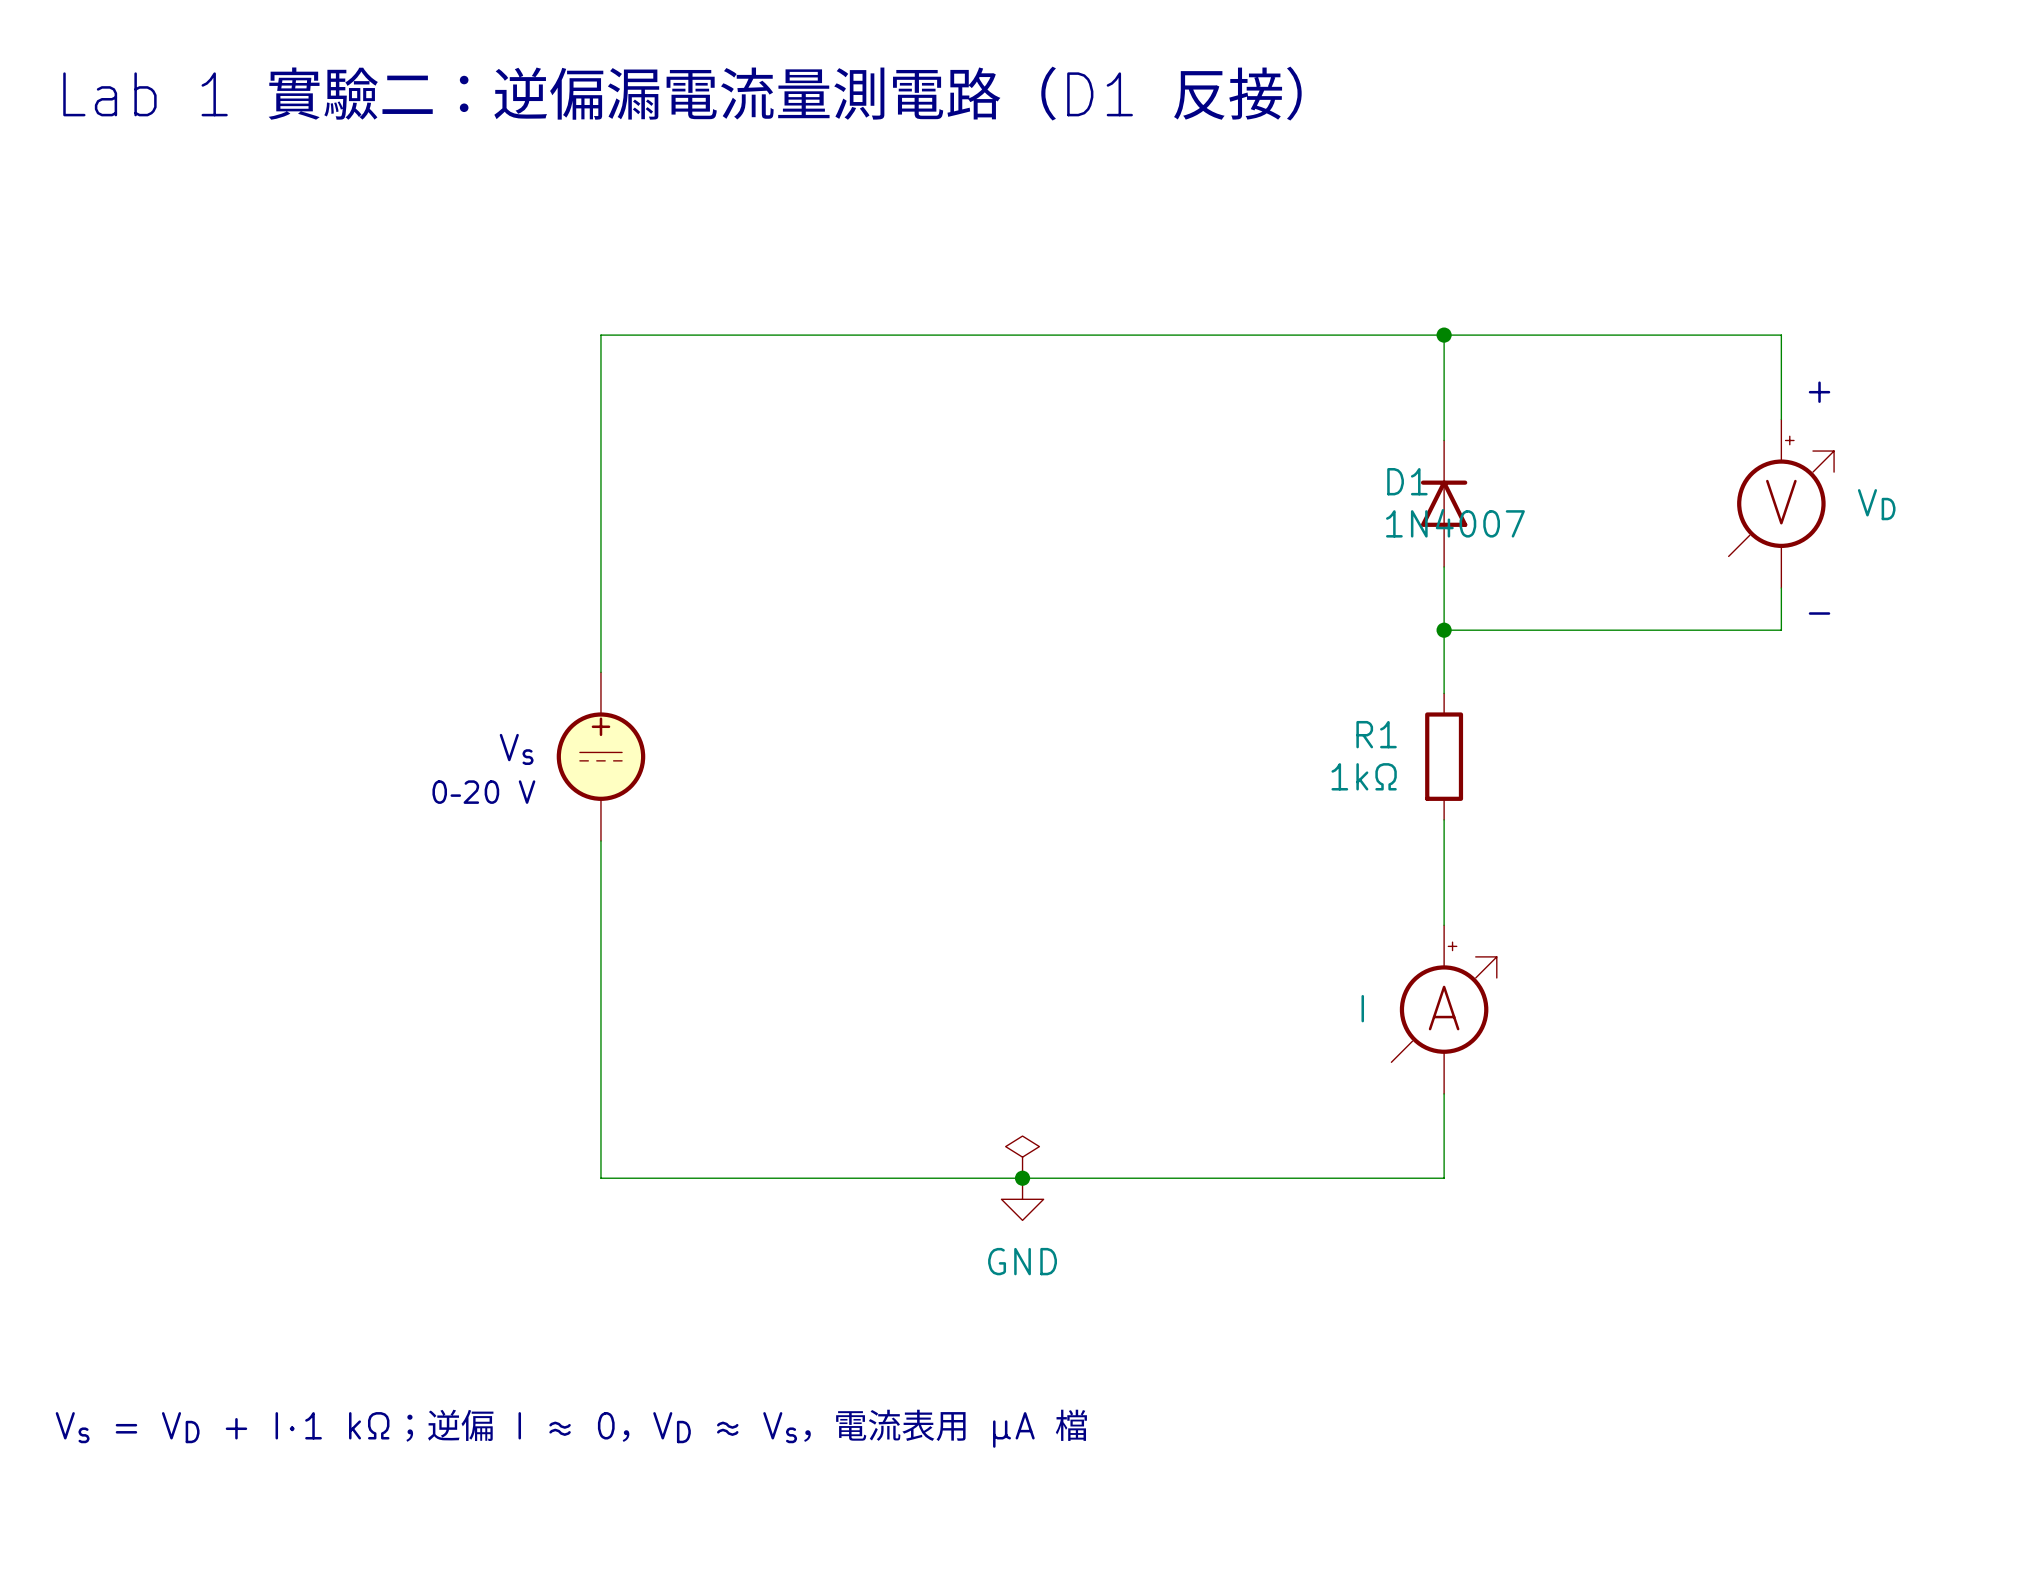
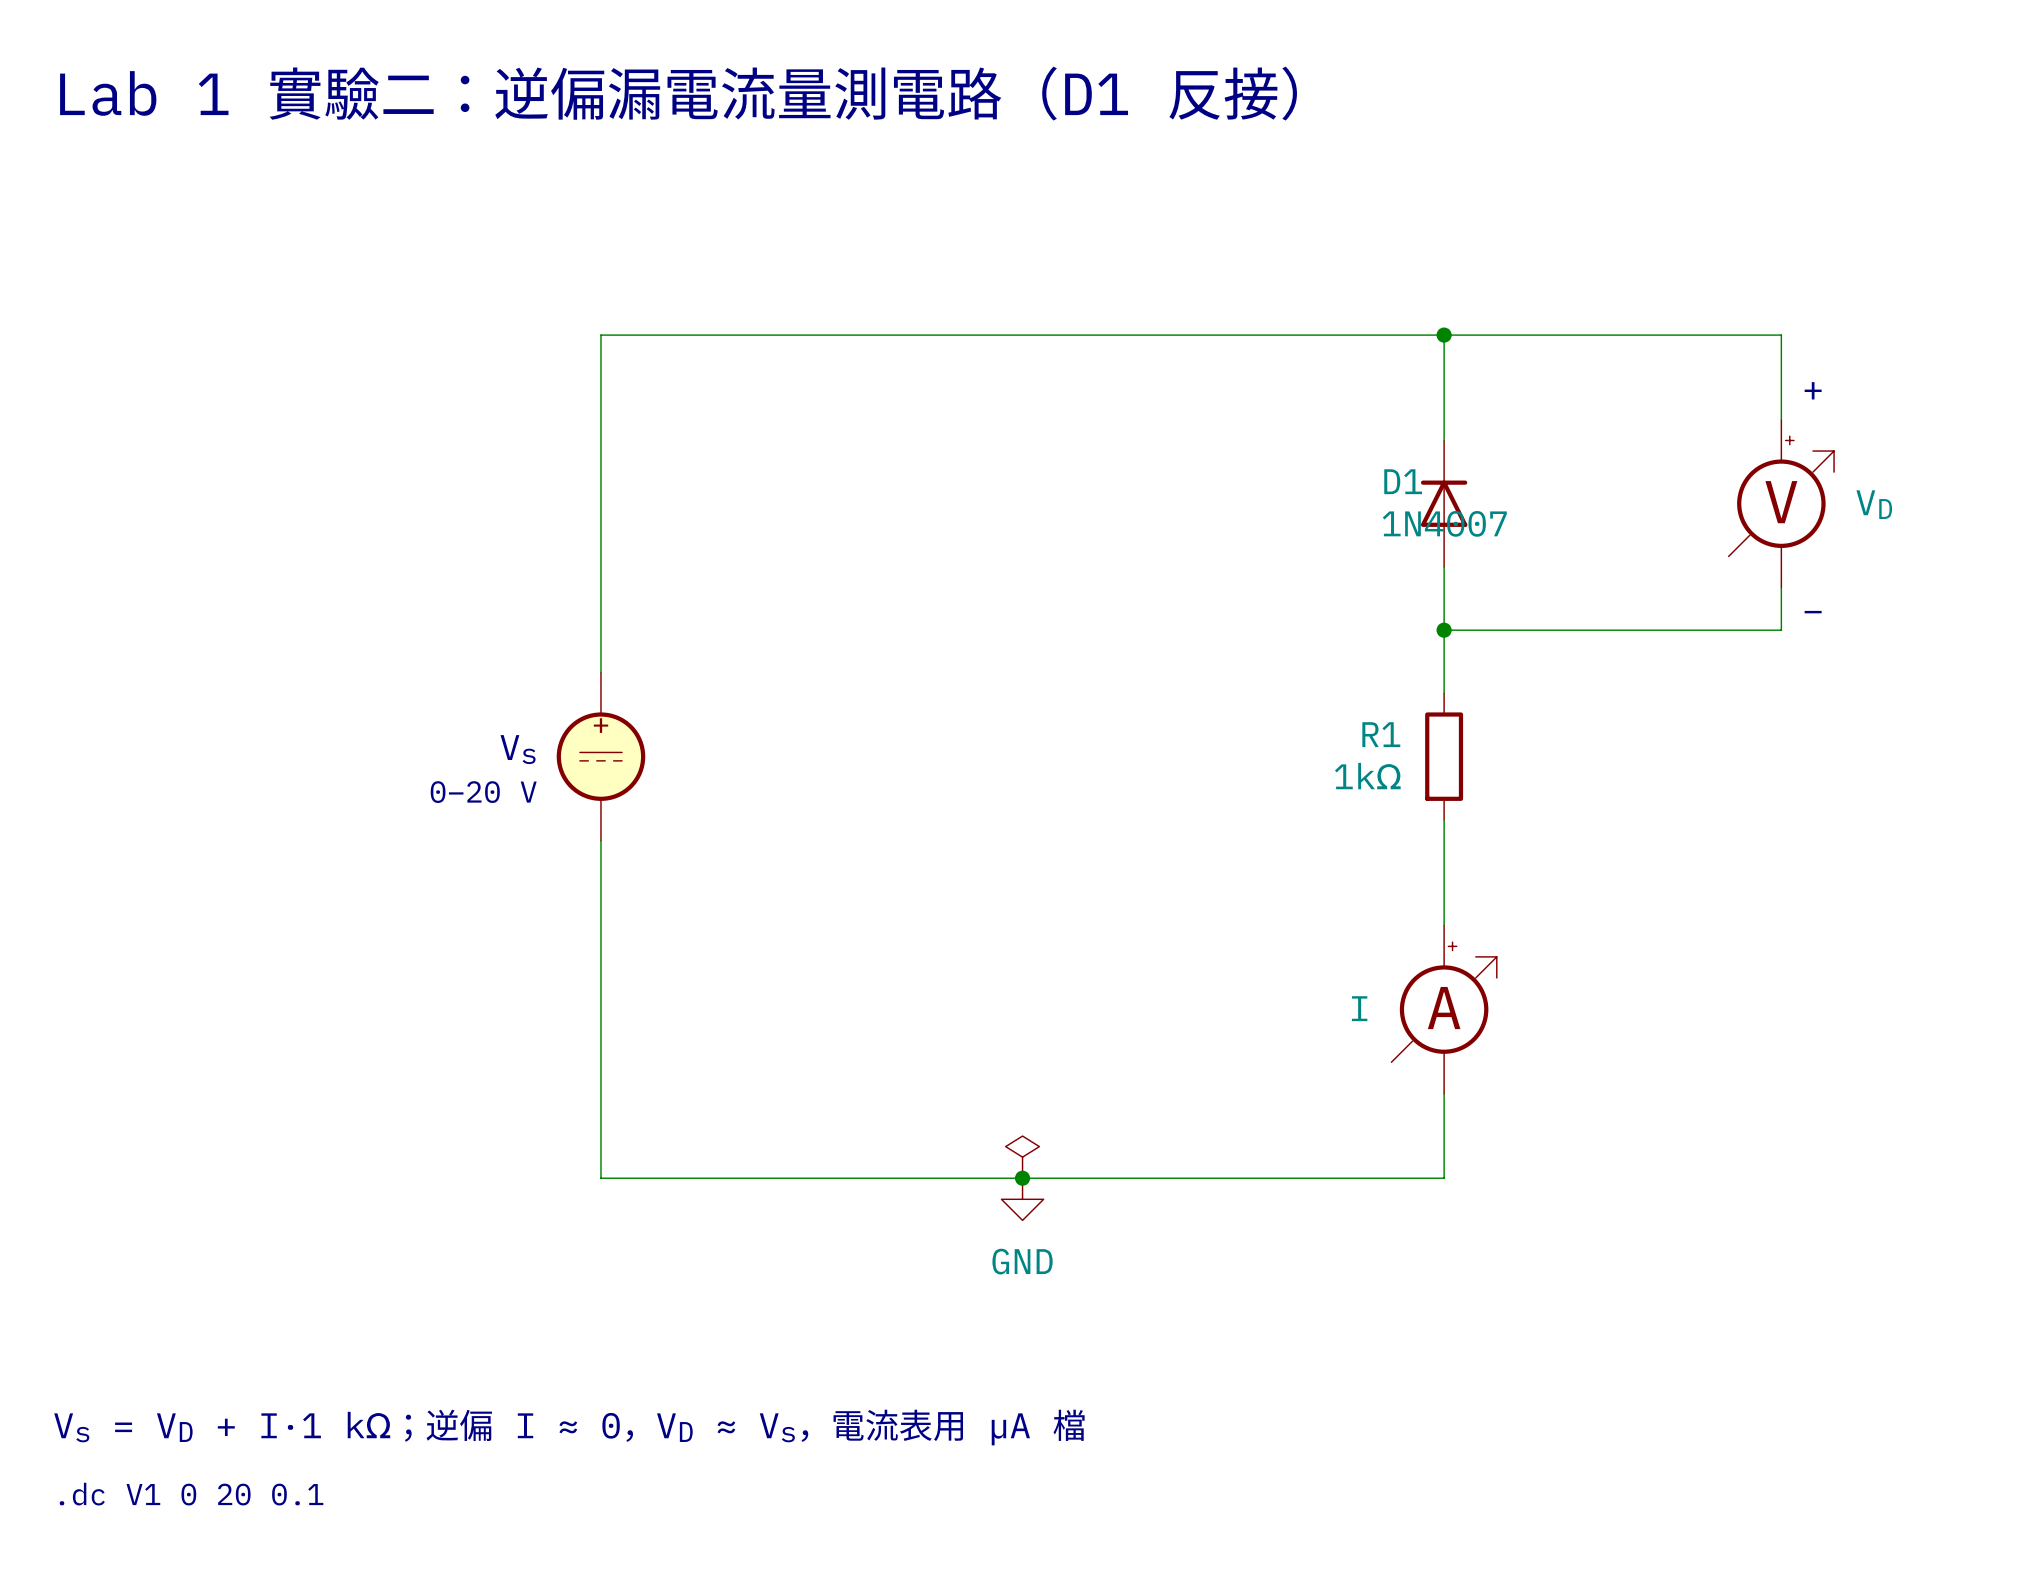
text: none -> .dc V1 0 20 0.1 (191, 1494)

